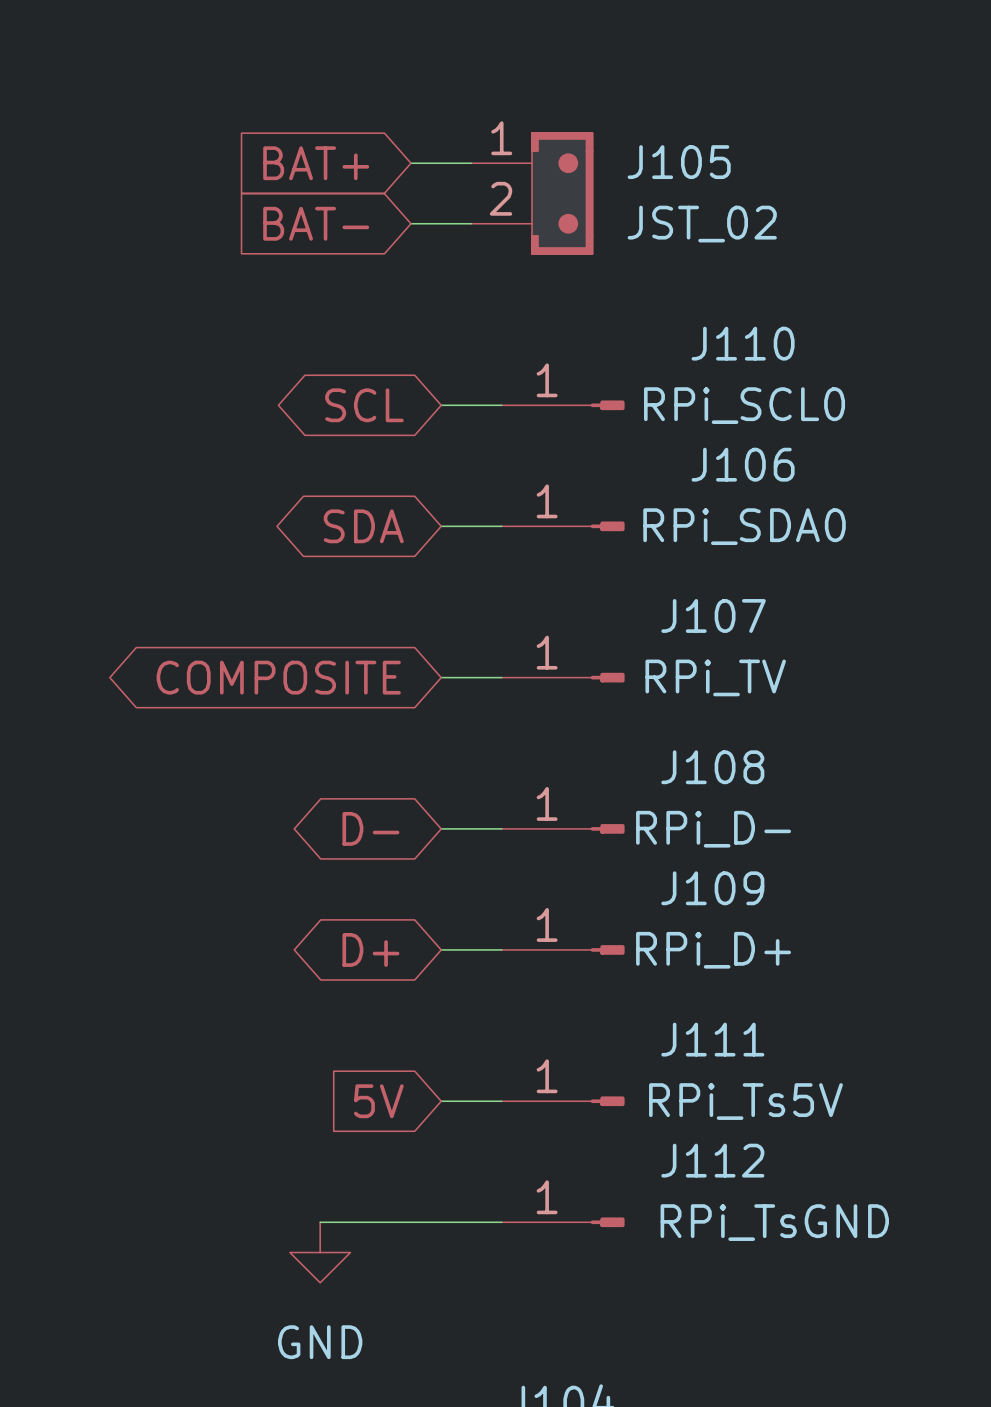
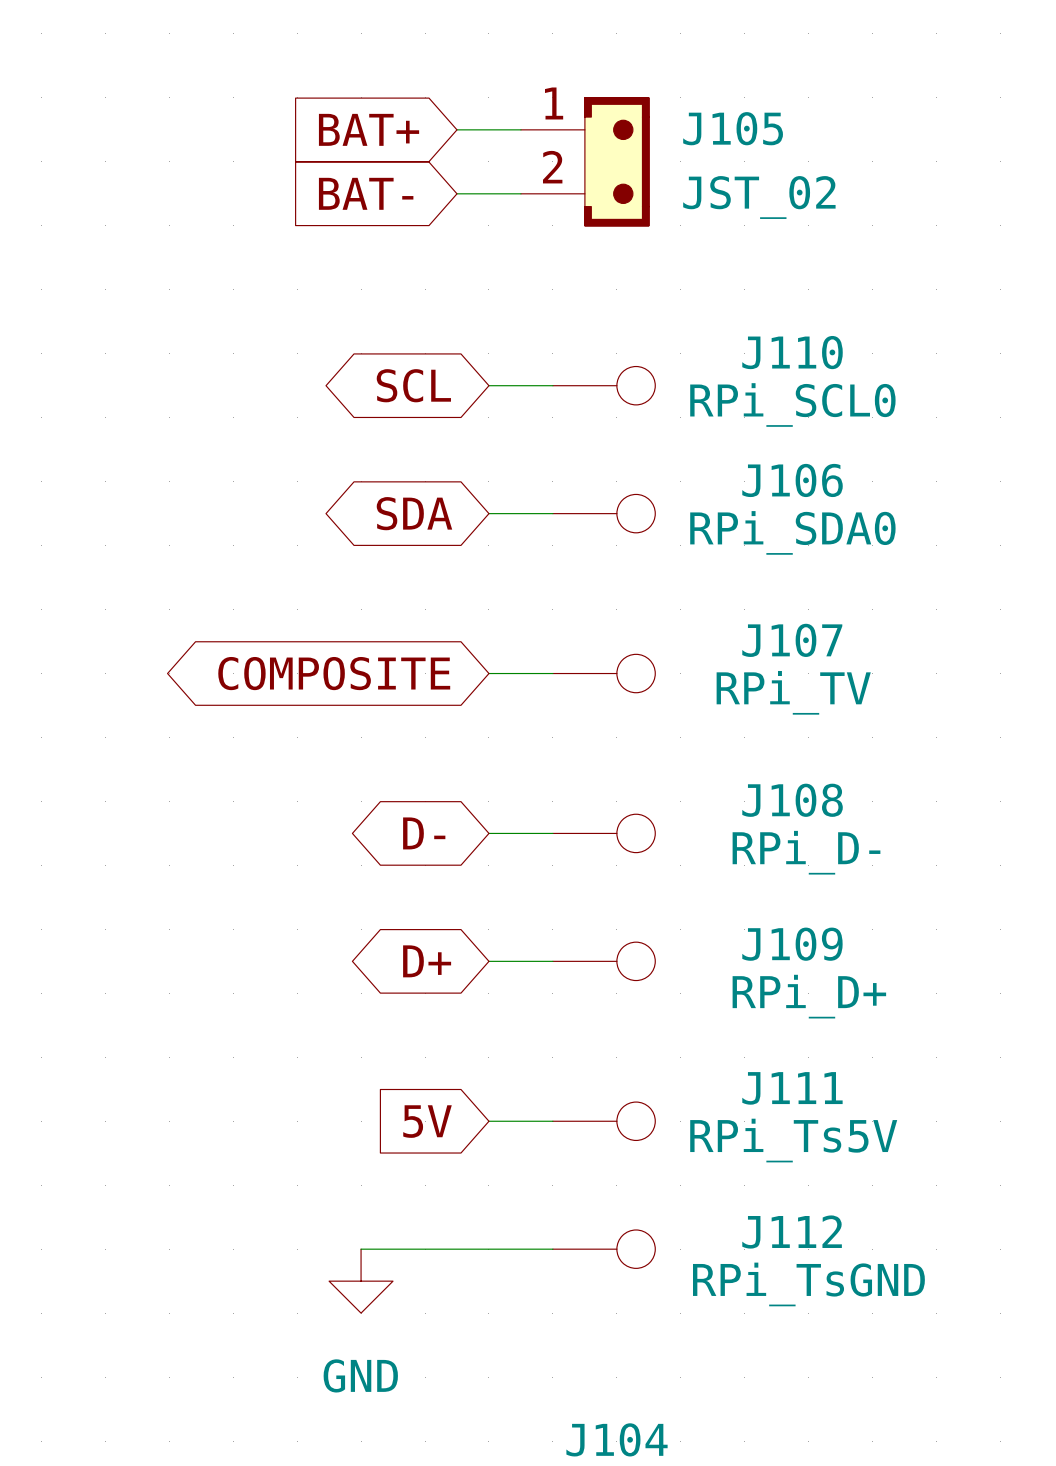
J110 symbol: [501, 400, 625, 411] -> [552, 366, 656, 405]
J106 symbol: [501, 521, 625, 532] -> [552, 494, 656, 533]
J107 symbol: [501, 672, 625, 683] -> [552, 654, 656, 693]
J108 symbol: [501, 824, 625, 834] -> [552, 814, 656, 853]
J109 name position: J109 (712, 888) -> J109 (792, 944)
J109 symbol: [501, 945, 625, 955] -> [552, 942, 656, 981]
J109 value position: RPi_D+ (713, 950) -> RPi_D+ (809, 996)
J111 symbol: [501, 1096, 625, 1107] -> [552, 1102, 656, 1141]
J112 name position: J112 (712, 1160) -> J112 (792, 1232)
J112 symbol: [501, 1217, 625, 1228] -> [552, 1229, 656, 1269]

